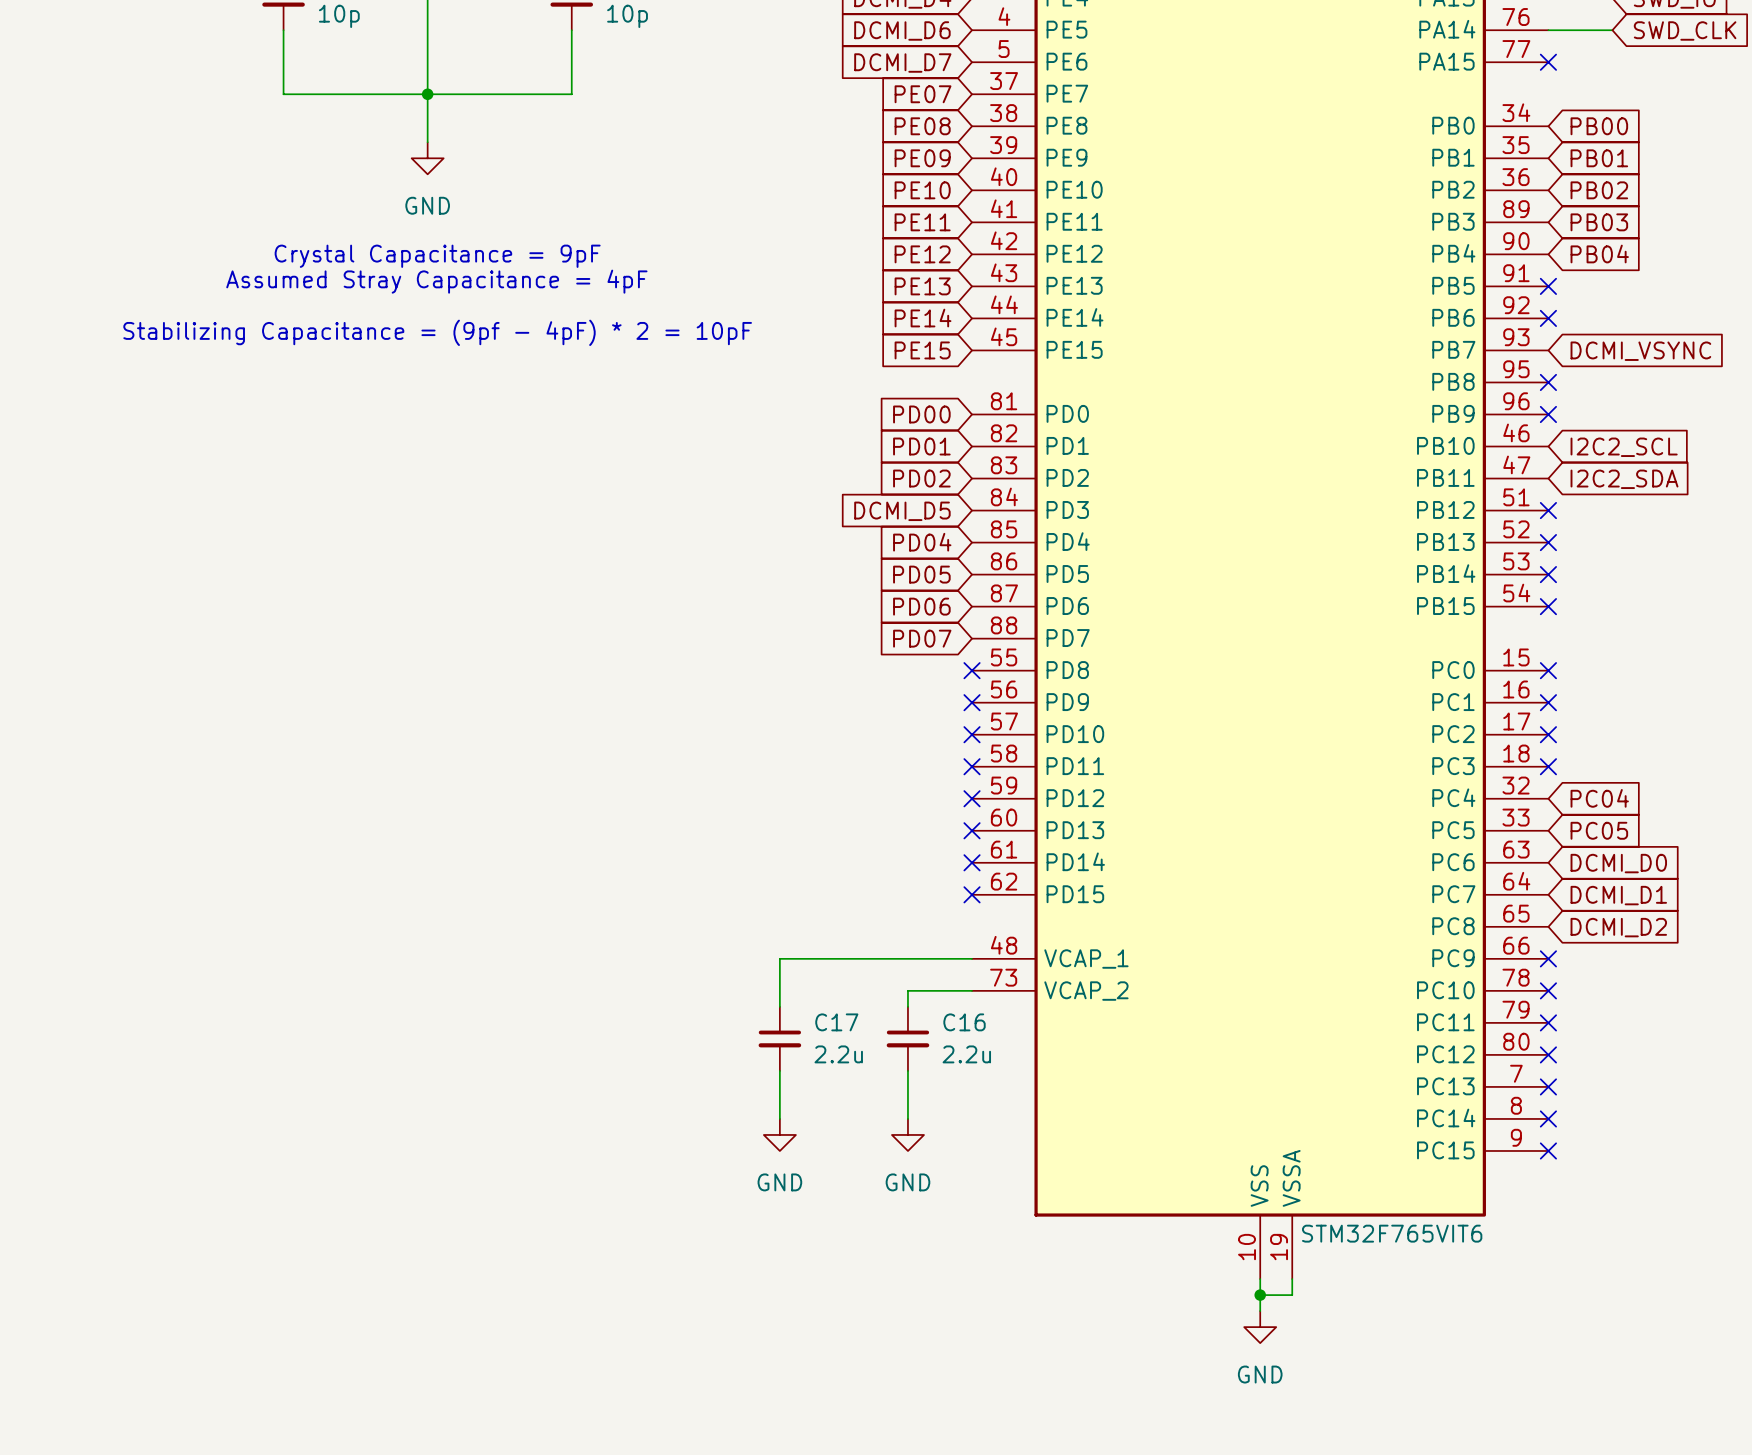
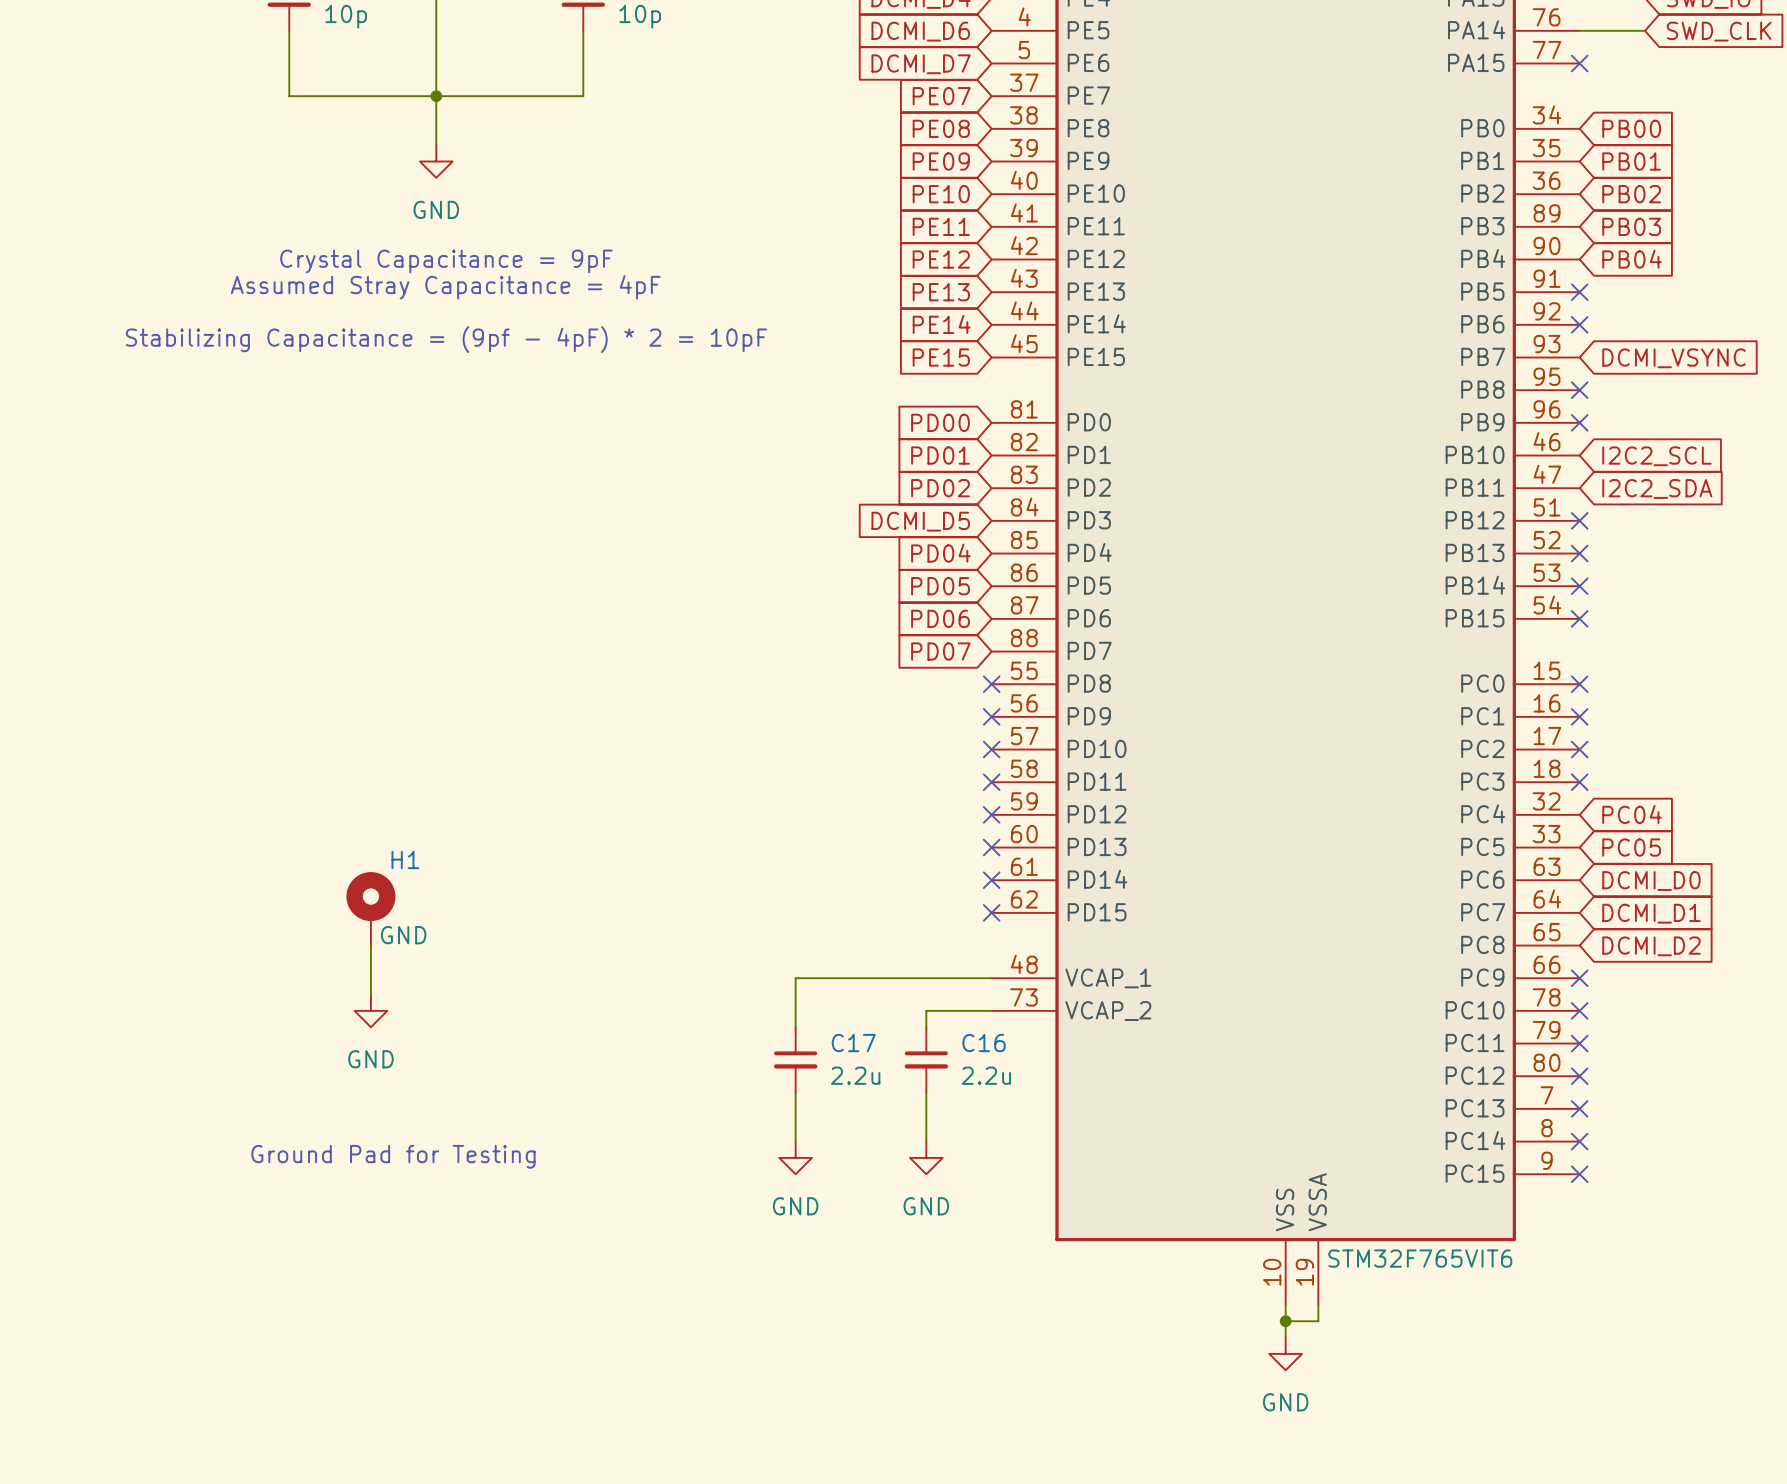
H1: none -> GND (370, 908)
wire: none -> (370, 945) (370, 994)
power symbol: none -> GND (370, 1010)
text: none -> Ground Pad for Testing (393, 1156)

